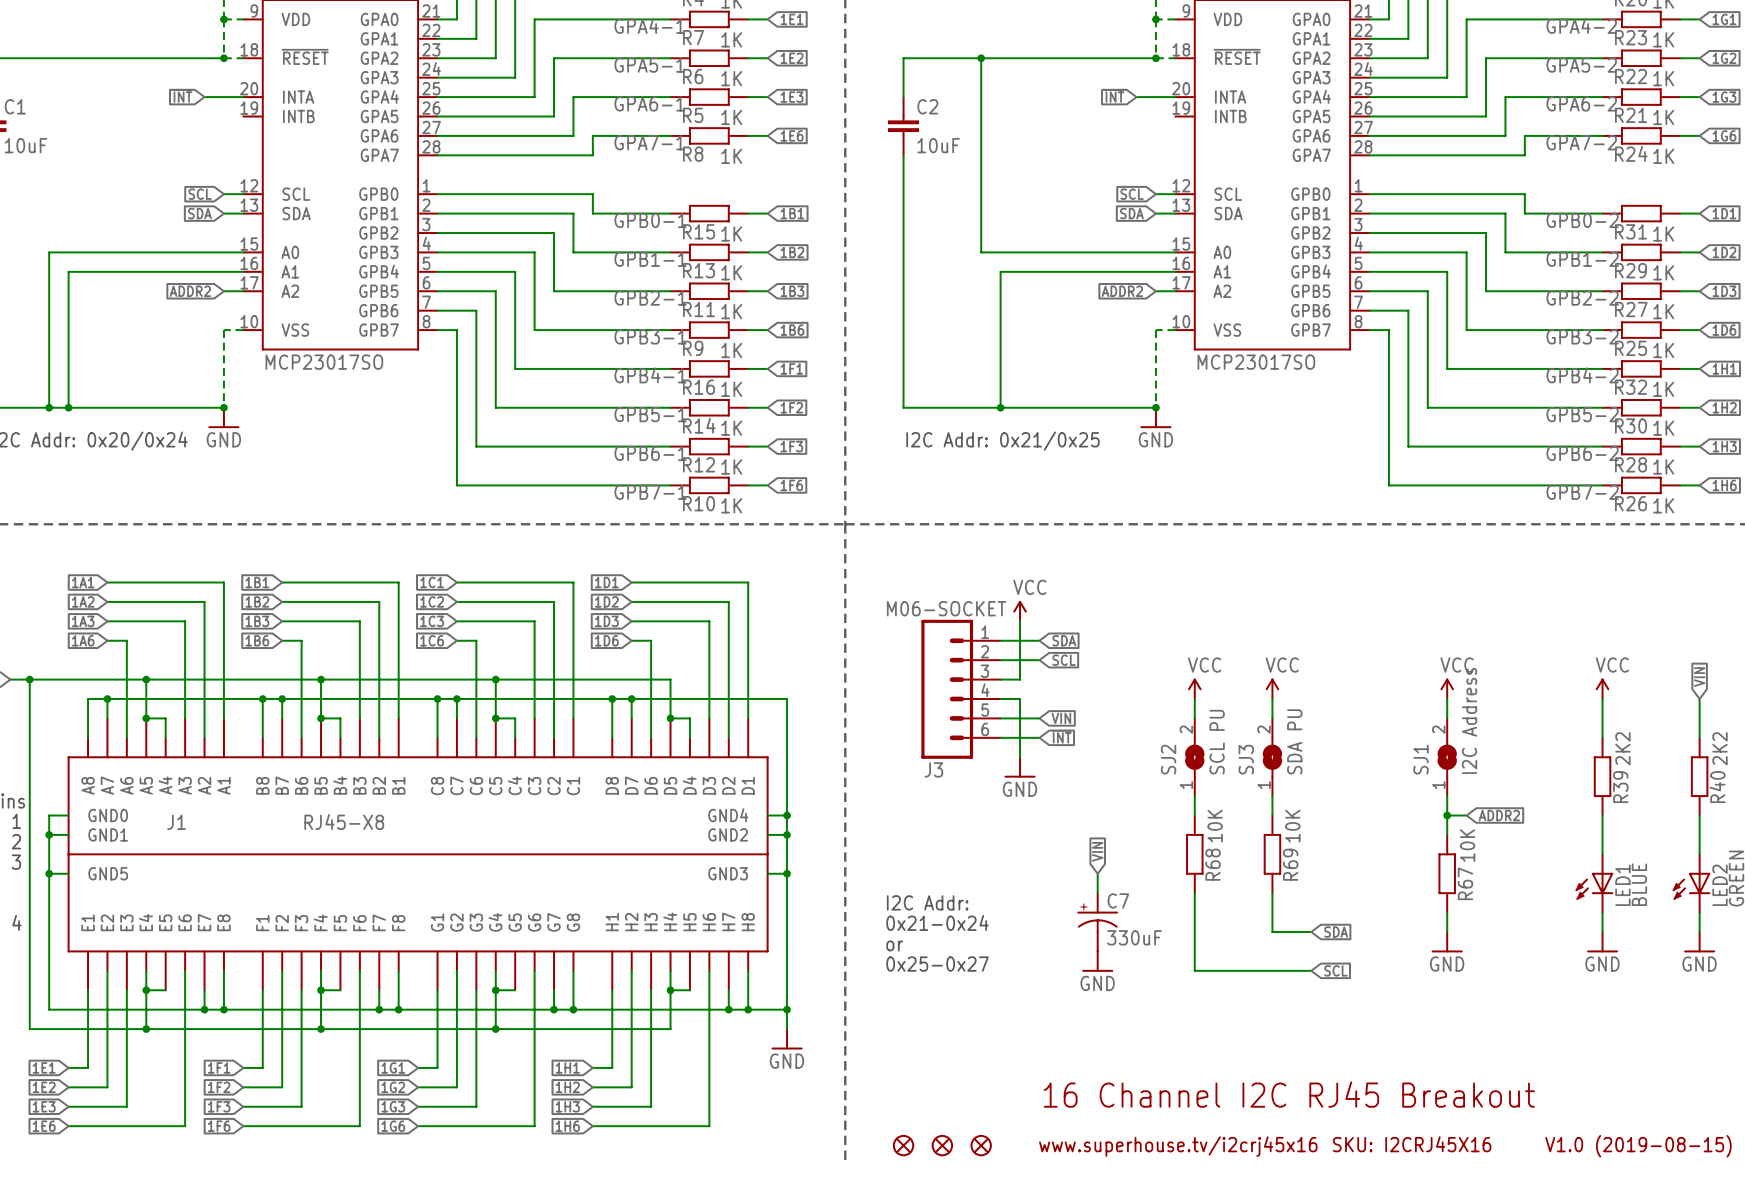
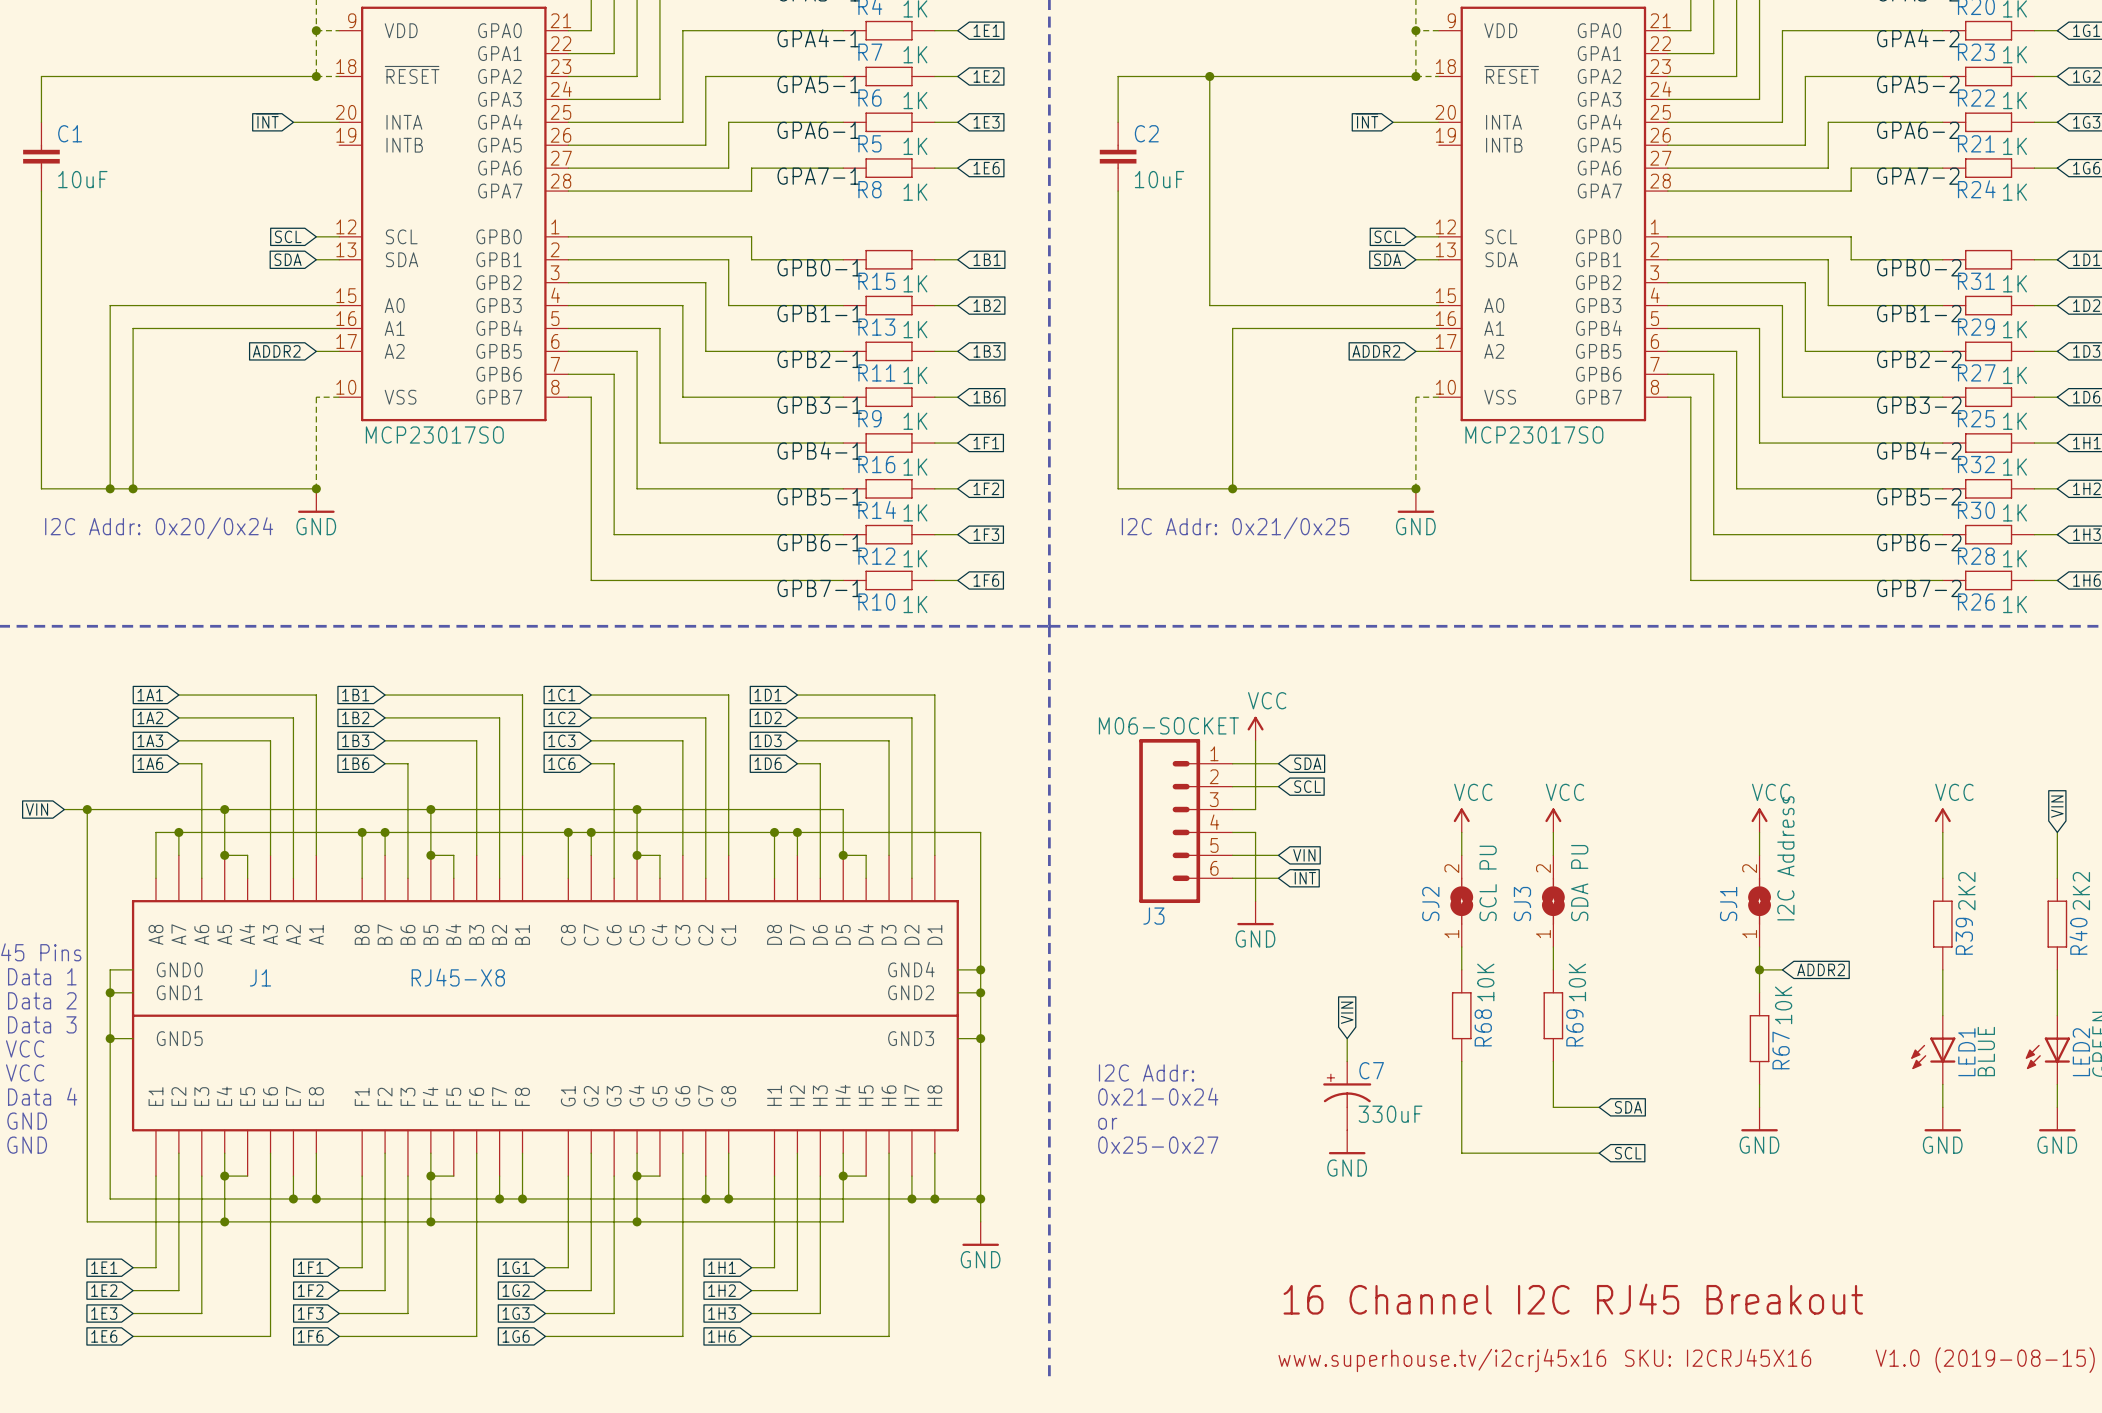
part: (903, 1145) -> none
part: (942, 1145) -> none
part: (981, 1145) -> none

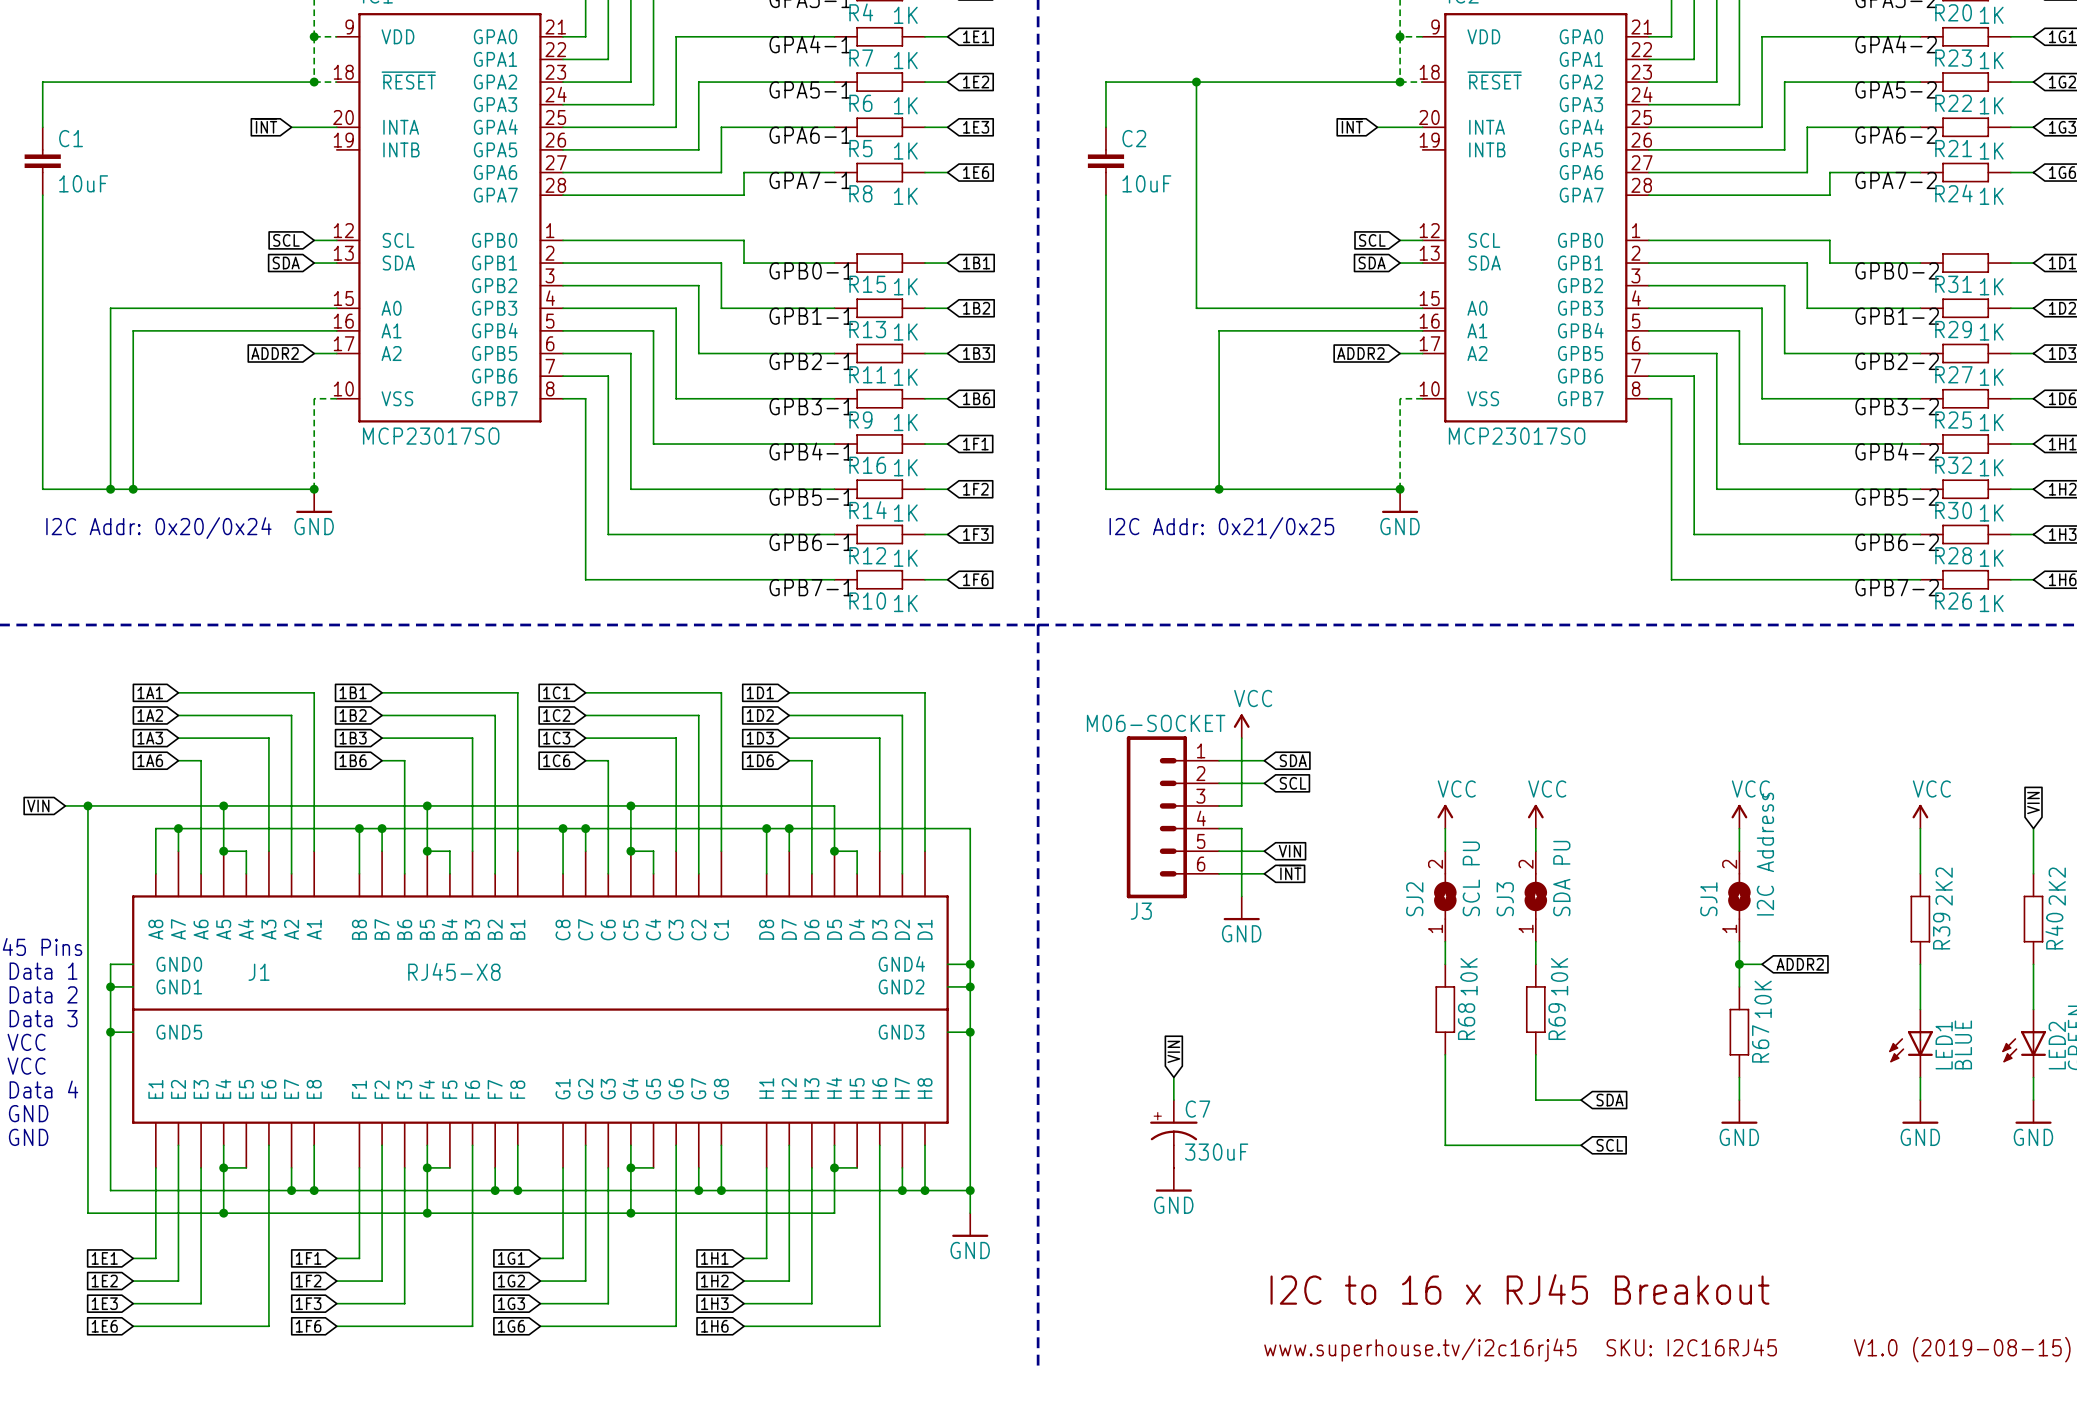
global label position: VIN (1347, 1012) -> VIN (1173, 1051)
wire: (1347, 1038) (1347, 1061) -> (1173, 1077) (1173, 1100)
text: I2C Addr: (1146, 1072) -> none
C7 position: (1347, 1095) -> (1173, 1133)
text: 0x21-0x24 (1158, 1096) -> none
text: or (1107, 1123) -> none
power symbol position: GND (1347, 1142) -> GND (1173, 1179)
text: 0x25-0x27 (1158, 1145) -> none
text: 16 Channel I2C RJ45 Breakout (1573, 1299) -> I2C to 16 x RJ45 Breakout (1519, 1289)
text: SKU: I2CRJ45X16 (1718, 1357) -> SKU: I2C16RJ45 (1691, 1347)
text: www.superhouse.tv/i2crj45x16 (1442, 1360) -> www.superhouse.tv/i2c16rj45 (1420, 1350)

